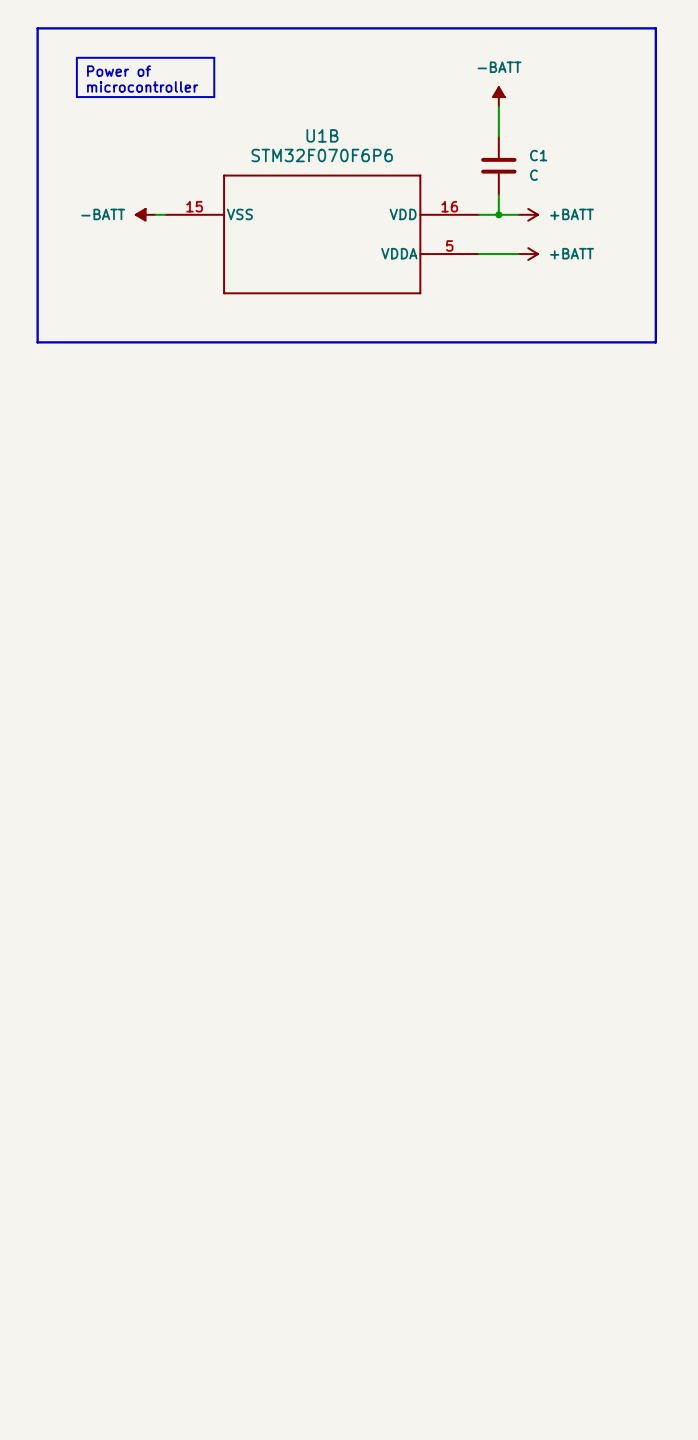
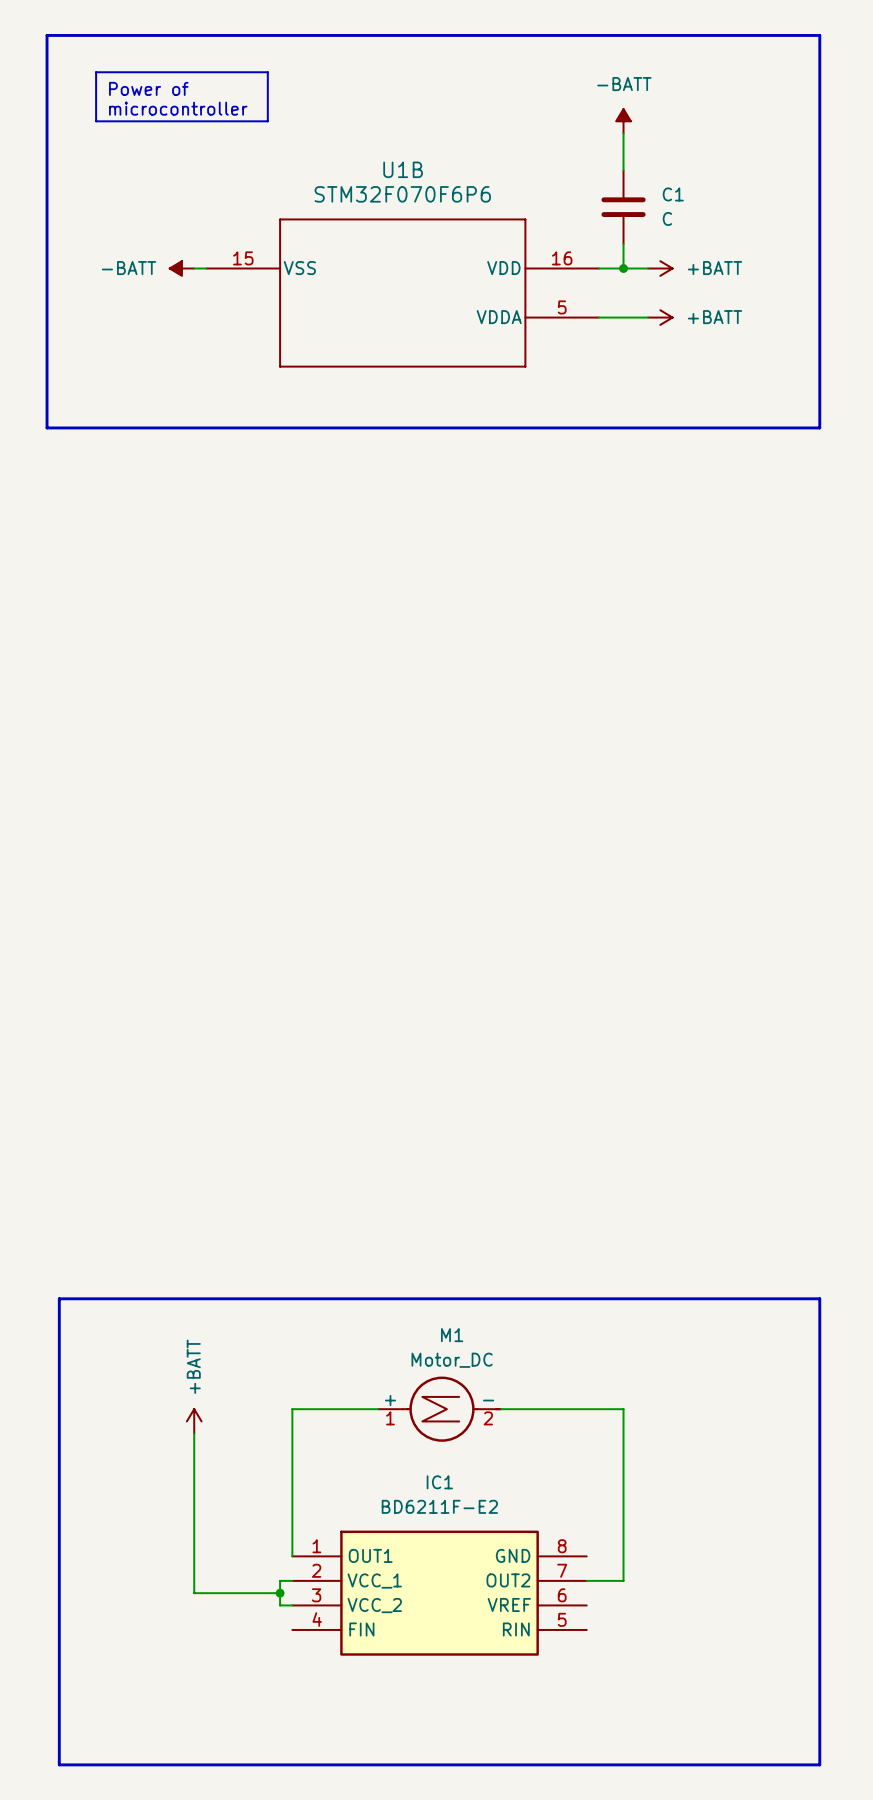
line: none -> (59, 1298) (819, 1298) (819, 1764) (59, 1764) (59, 1298)
wire: none -> (378, 1409) (292, 1409) (292, 1556)
M1: none -> Motor_DC (439, 1409)
wire: none -> (500, 1409) (623, 1409) (623, 1580) (586, 1580)
power symbol: none -> +BATT (194, 1421)
wire: none -> (194, 1433) (194, 1593) (280, 1593)
wire: none -> (292, 1580) (280, 1580) (280, 1605) (292, 1605)
junction: none -> (280, 1593)
IC1: none -> BD6211F-E2 (439, 1593)

